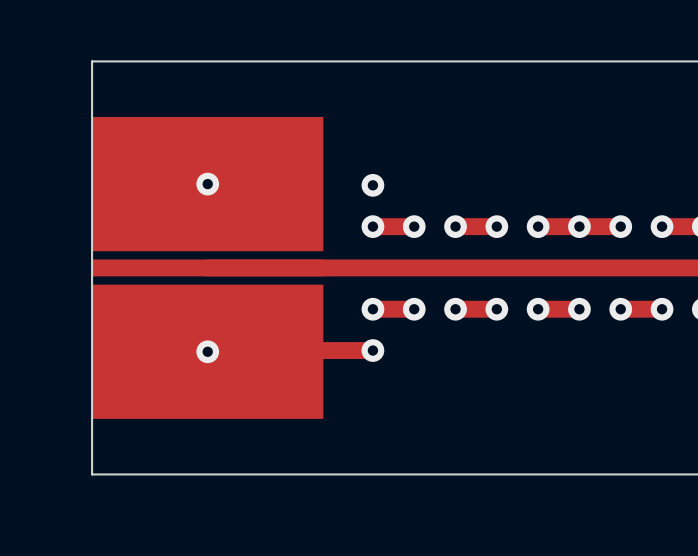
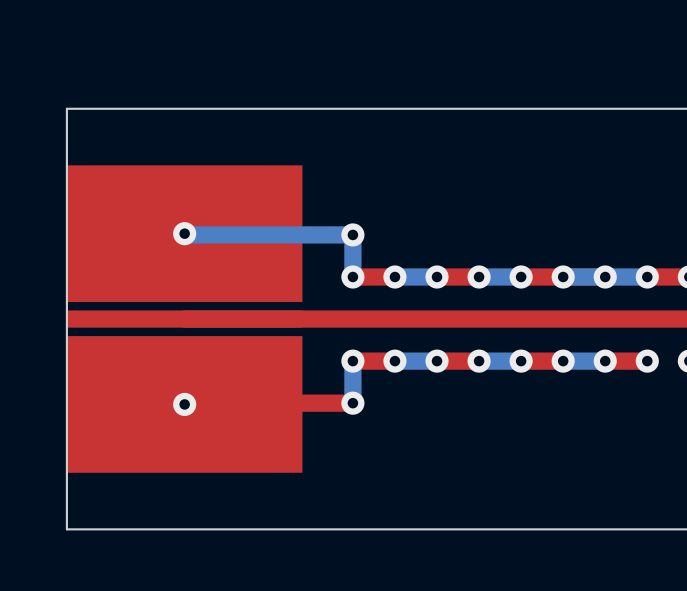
bottom track: none -> (184, 233) (352, 234) (352, 277)
bottom track: none -> (437, 277) (394, 277)
bottom track: none -> (521, 277) (479, 277)
bottom track: none -> (647, 277) (563, 277)
bottom track: none -> (352, 361) (352, 403)
bottom track: none -> (437, 361) (394, 361)
bottom track: none -> (521, 361) (479, 361)
bottom track: none -> (605, 361) (563, 361)

